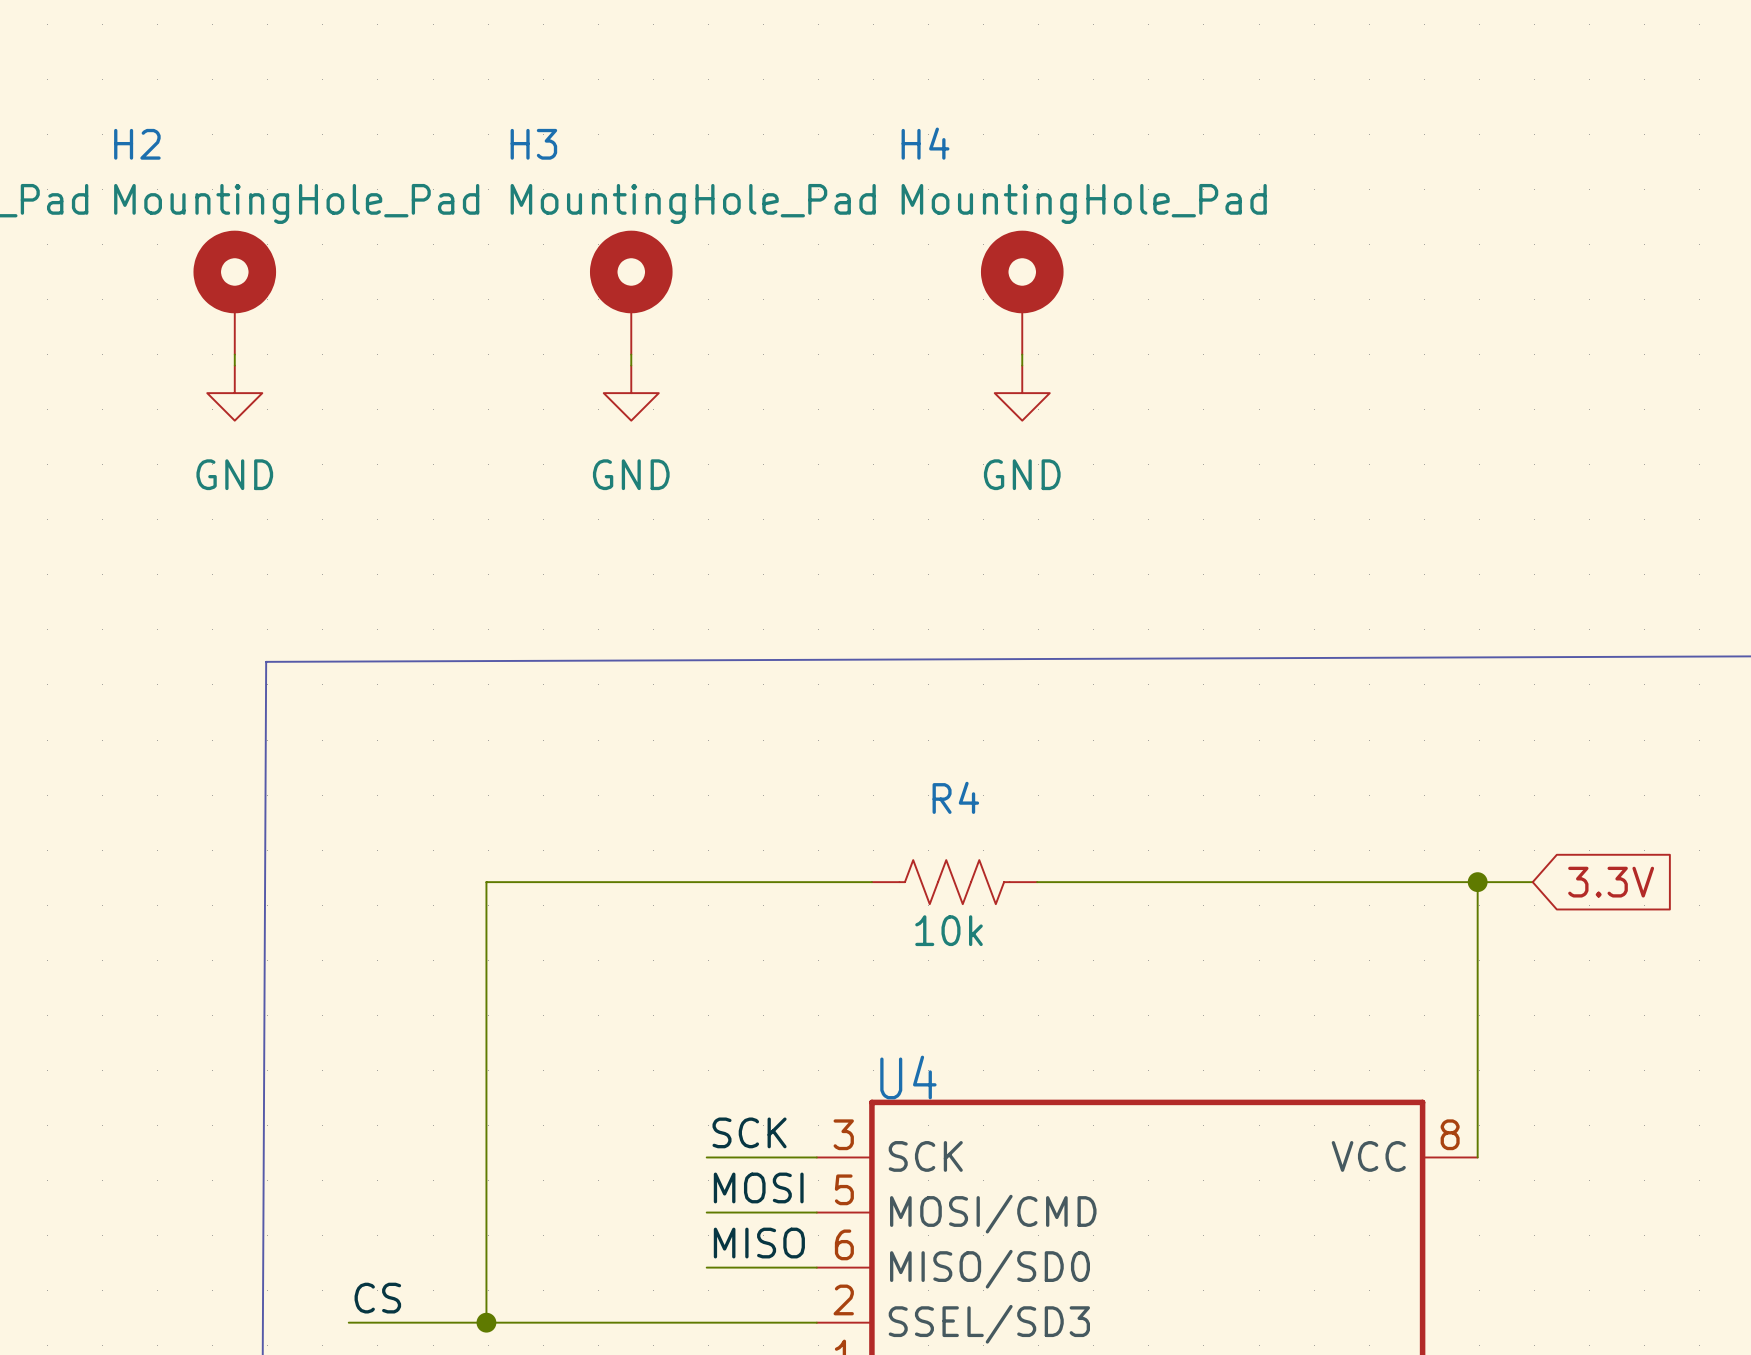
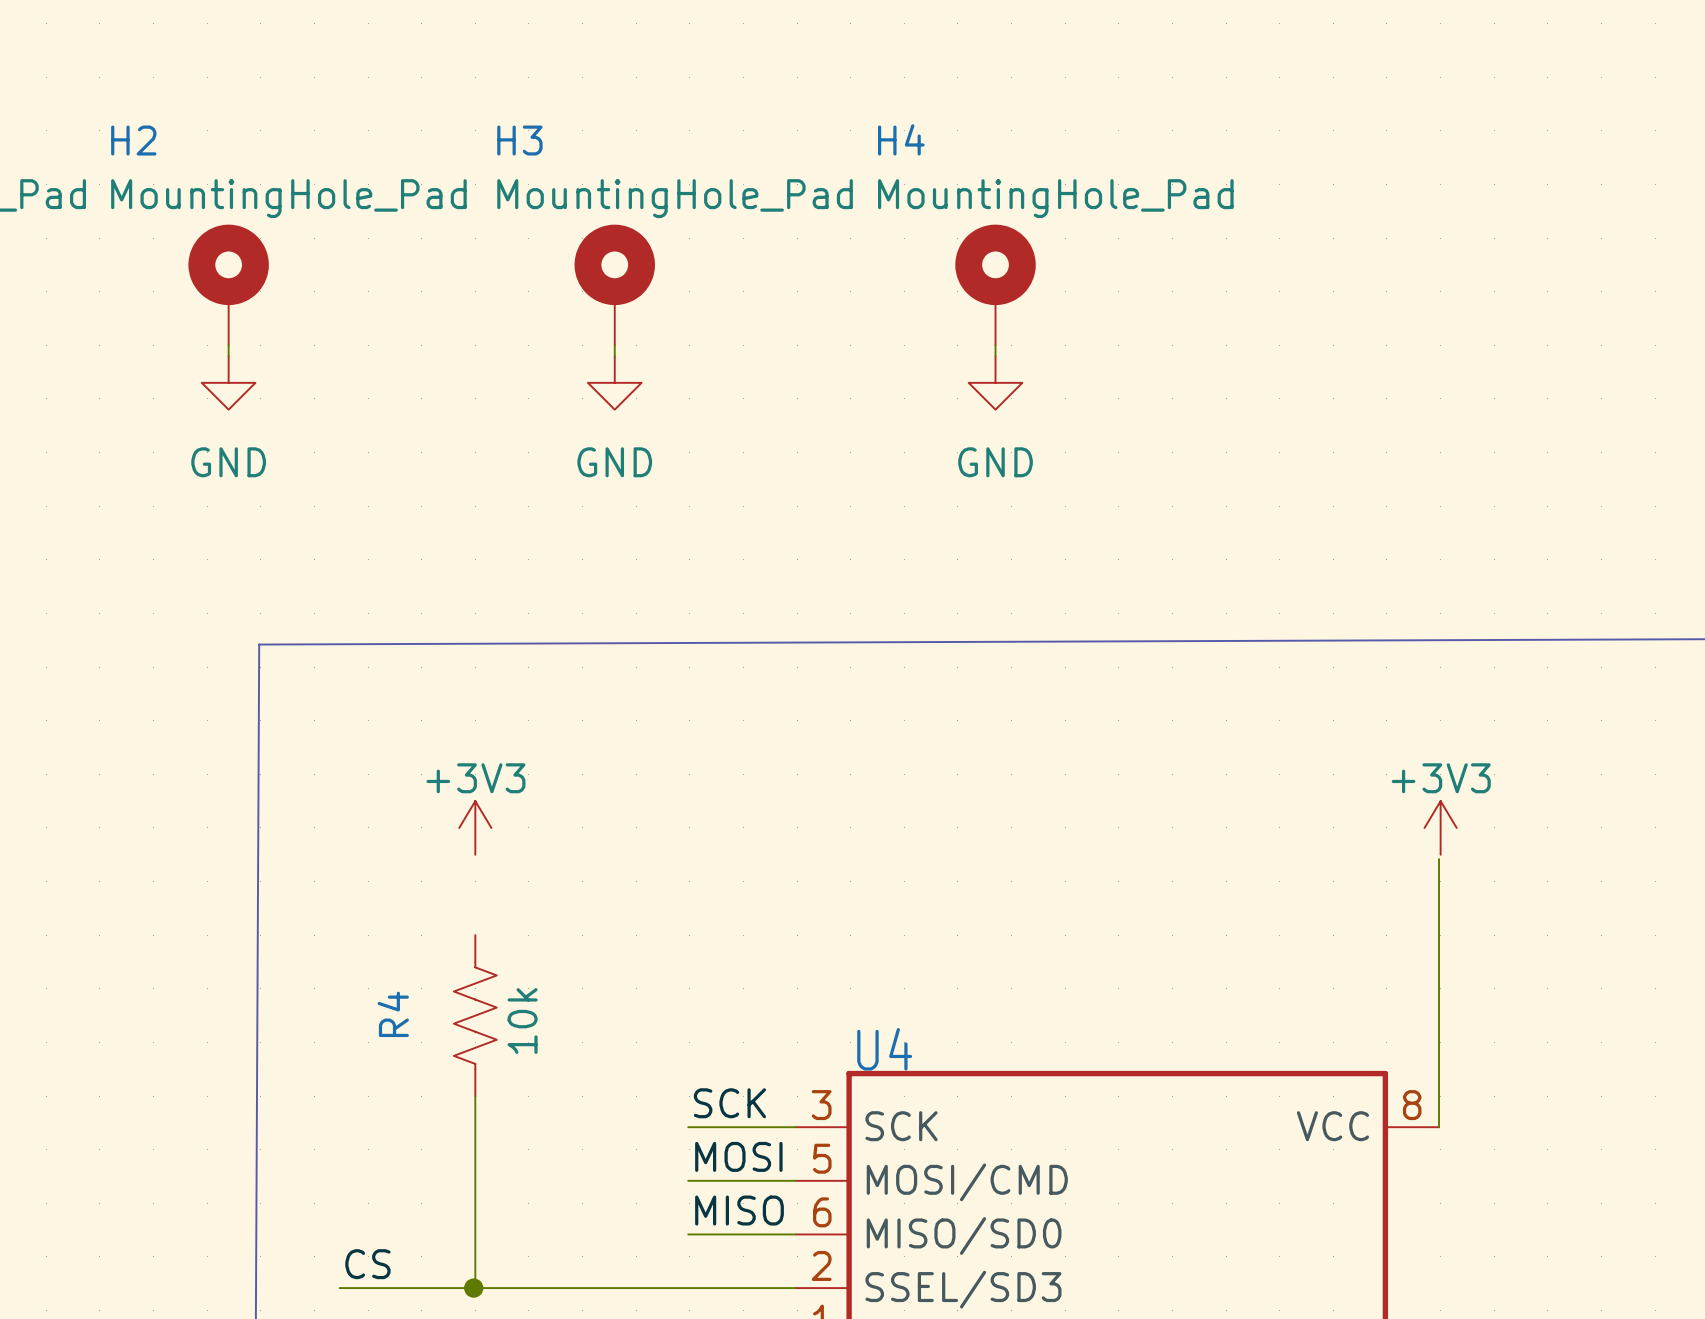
R4 name position: R4 (955, 797) -> R4 (393, 1014)
power symbol: none -> +3V3 (475, 827)
power symbol: none -> +3V3 (1440, 827)
wire: (871, 882) (486, 882) (486, 1322) -> (475, 1096) (475, 1283) (473, 1288)
R4 rotation: 0° (954, 882) -> 90° clockwise (475, 1015)
R4 position: (954, 882) -> (475, 1015)
wire: (1037, 882) (1532, 882) -> none
junction: (1477, 882) -> none
global label: 3.3V (1611, 882) -> none
R4 value position: 10k (949, 930) -> 10k (522, 1021)

